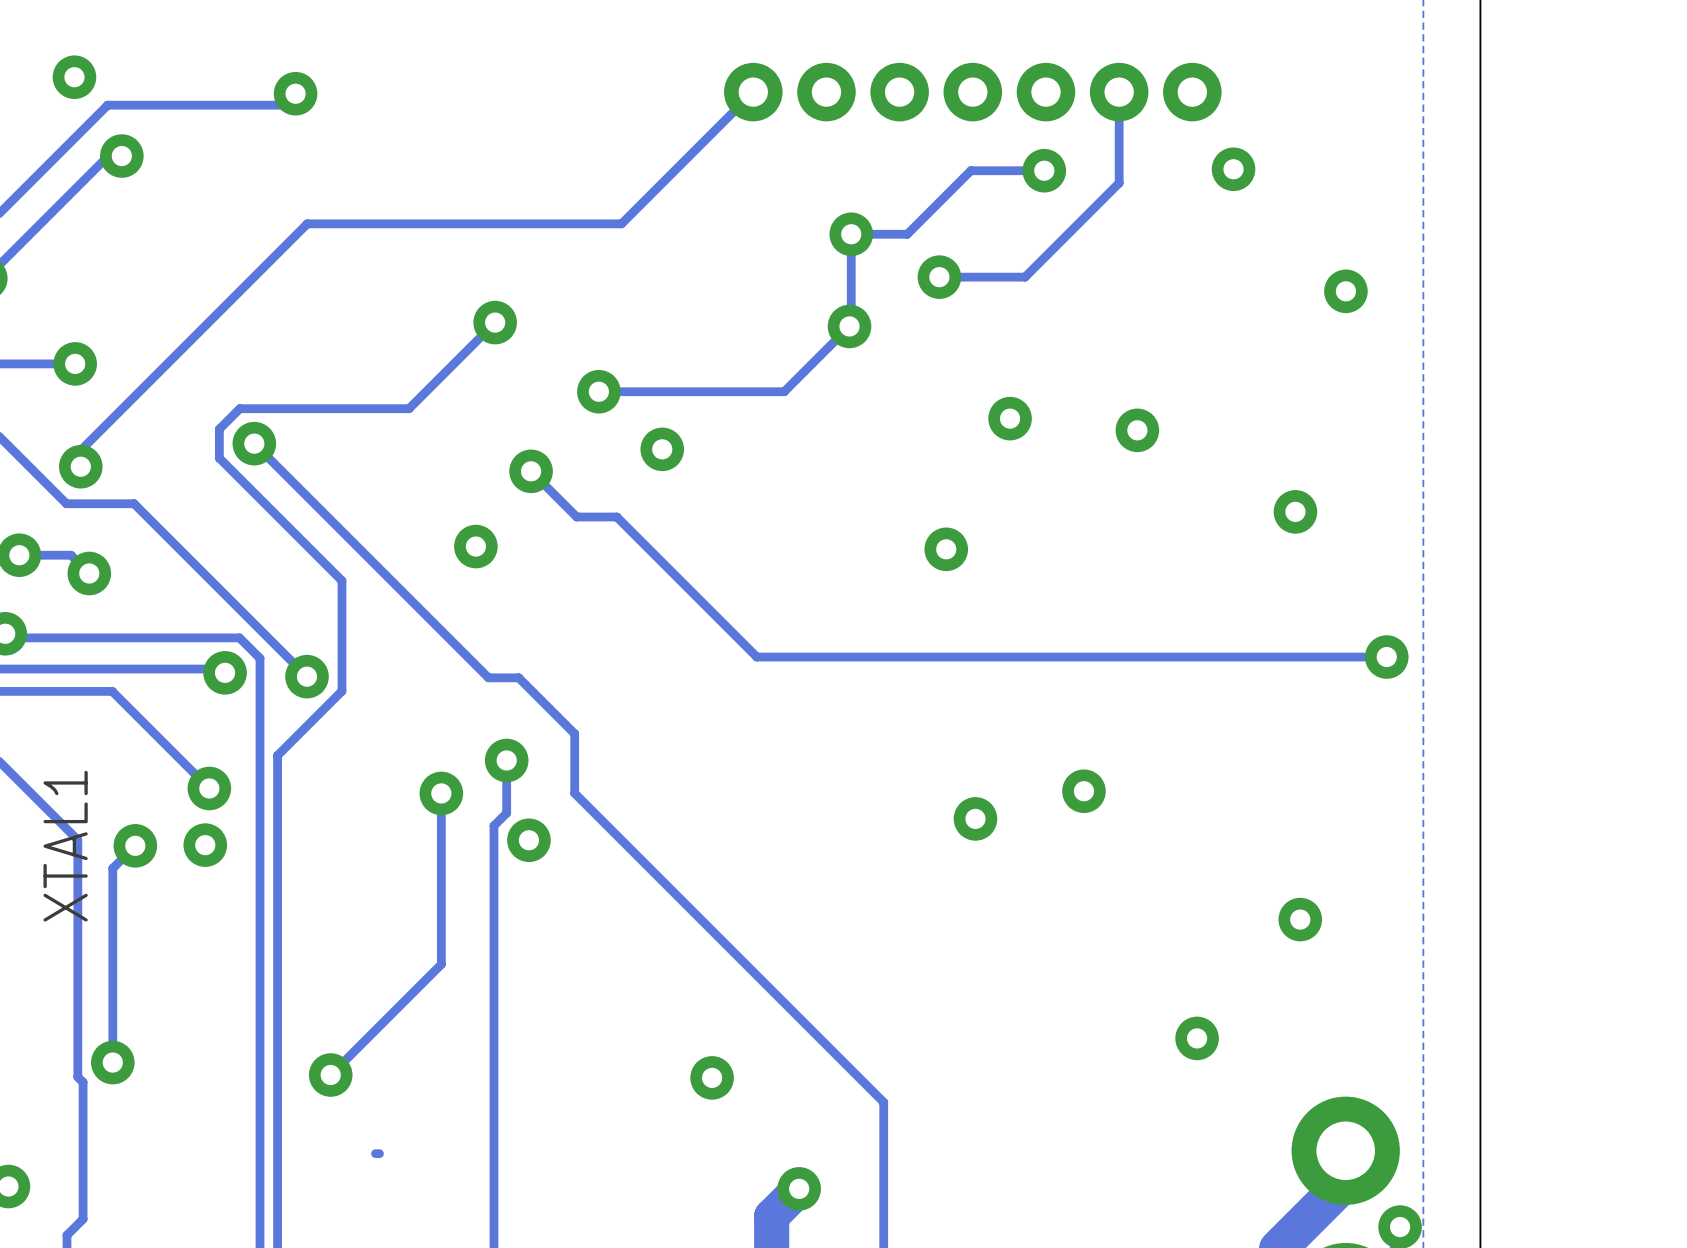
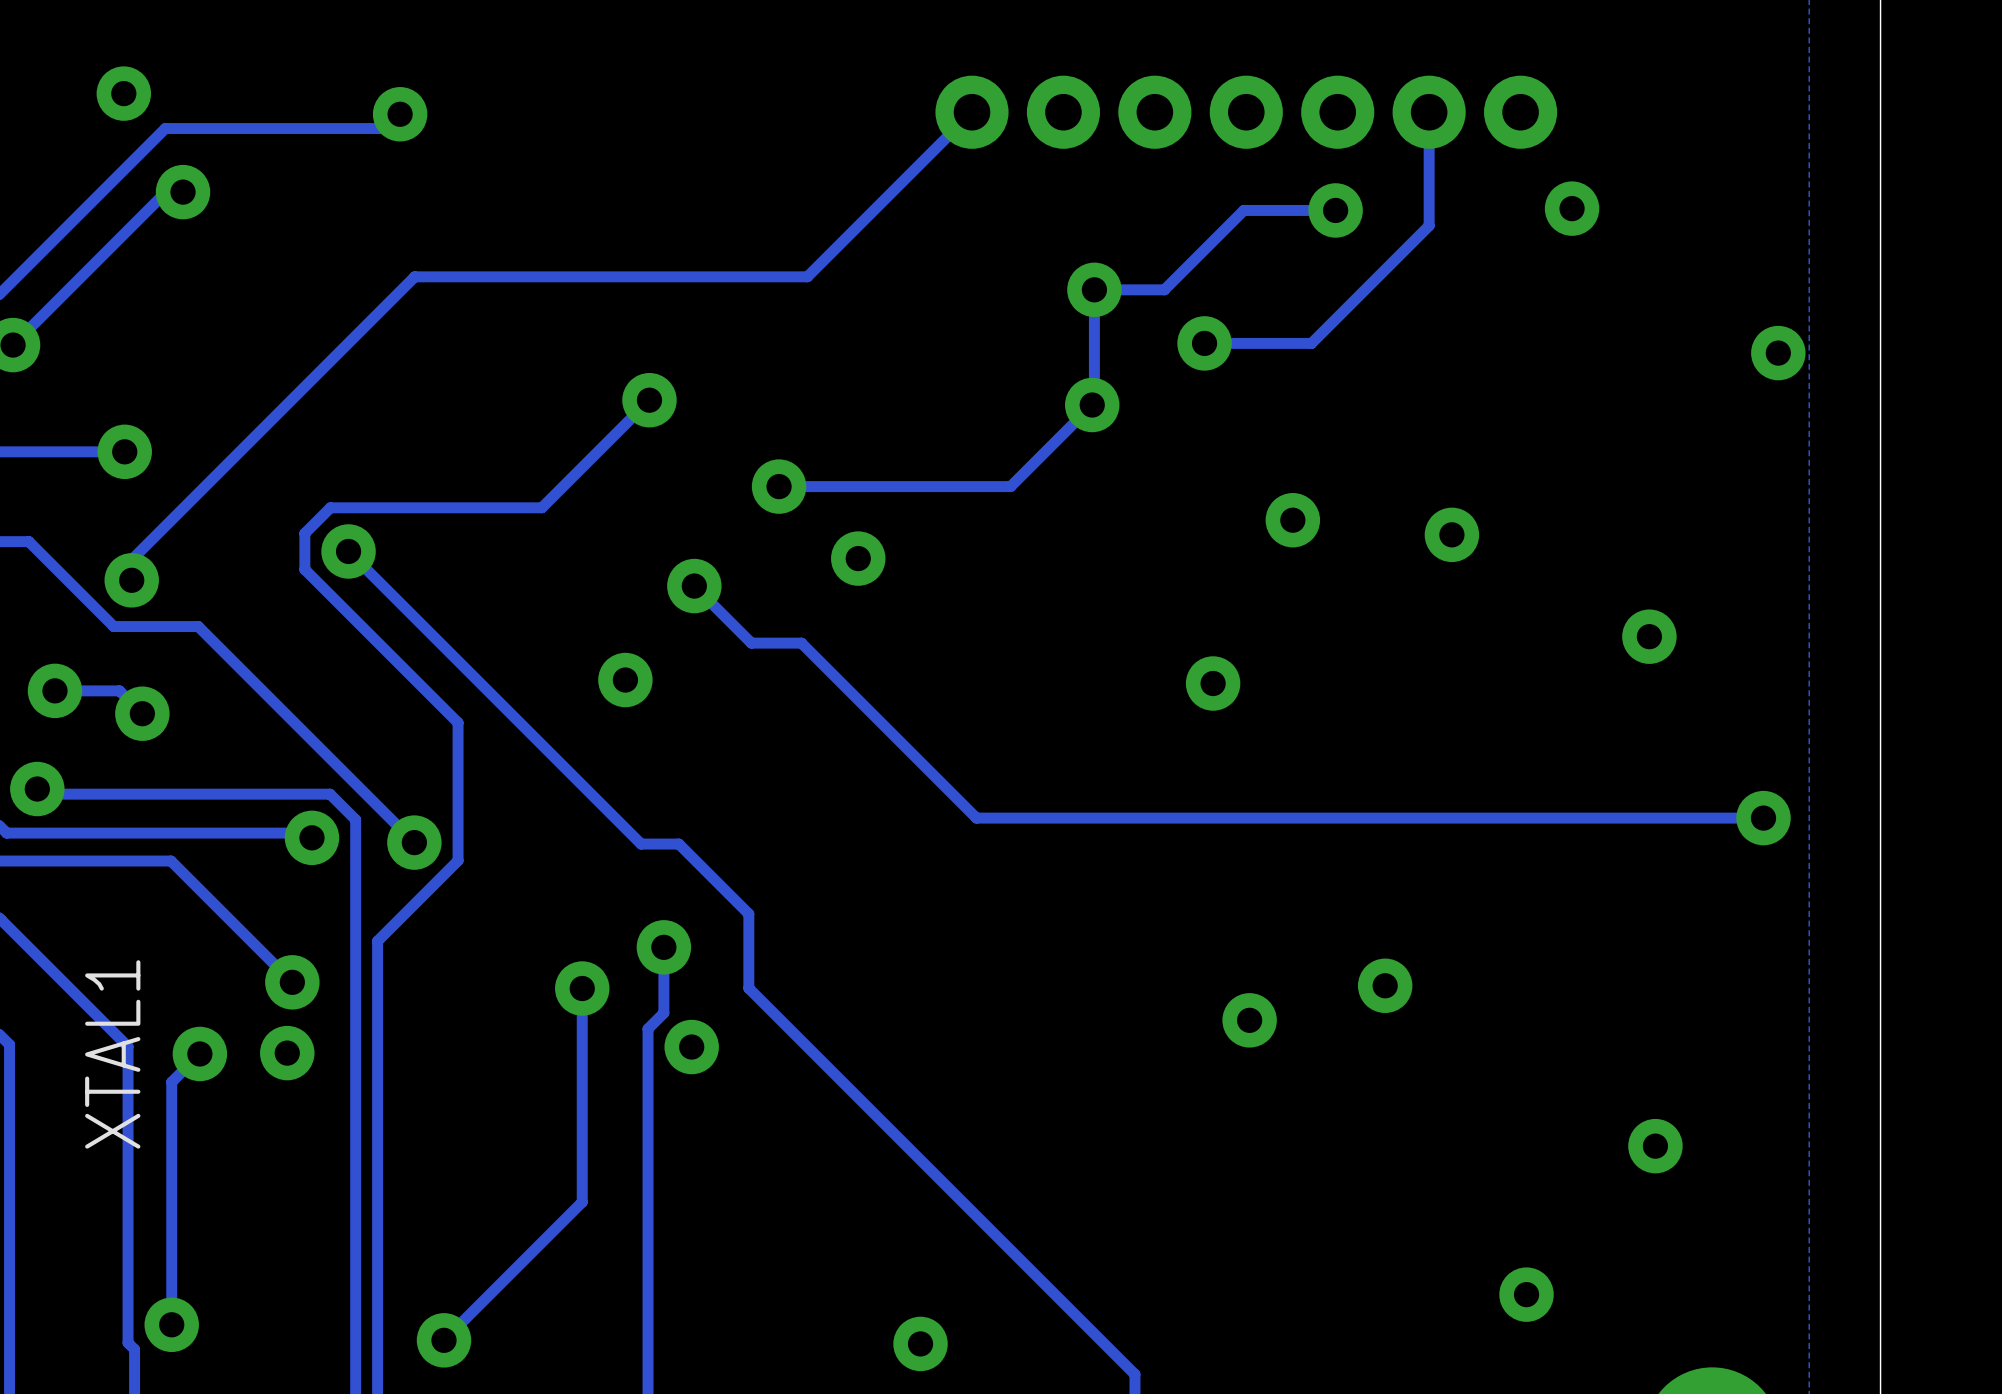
via position: (1345, 291) -> (1778, 353)

